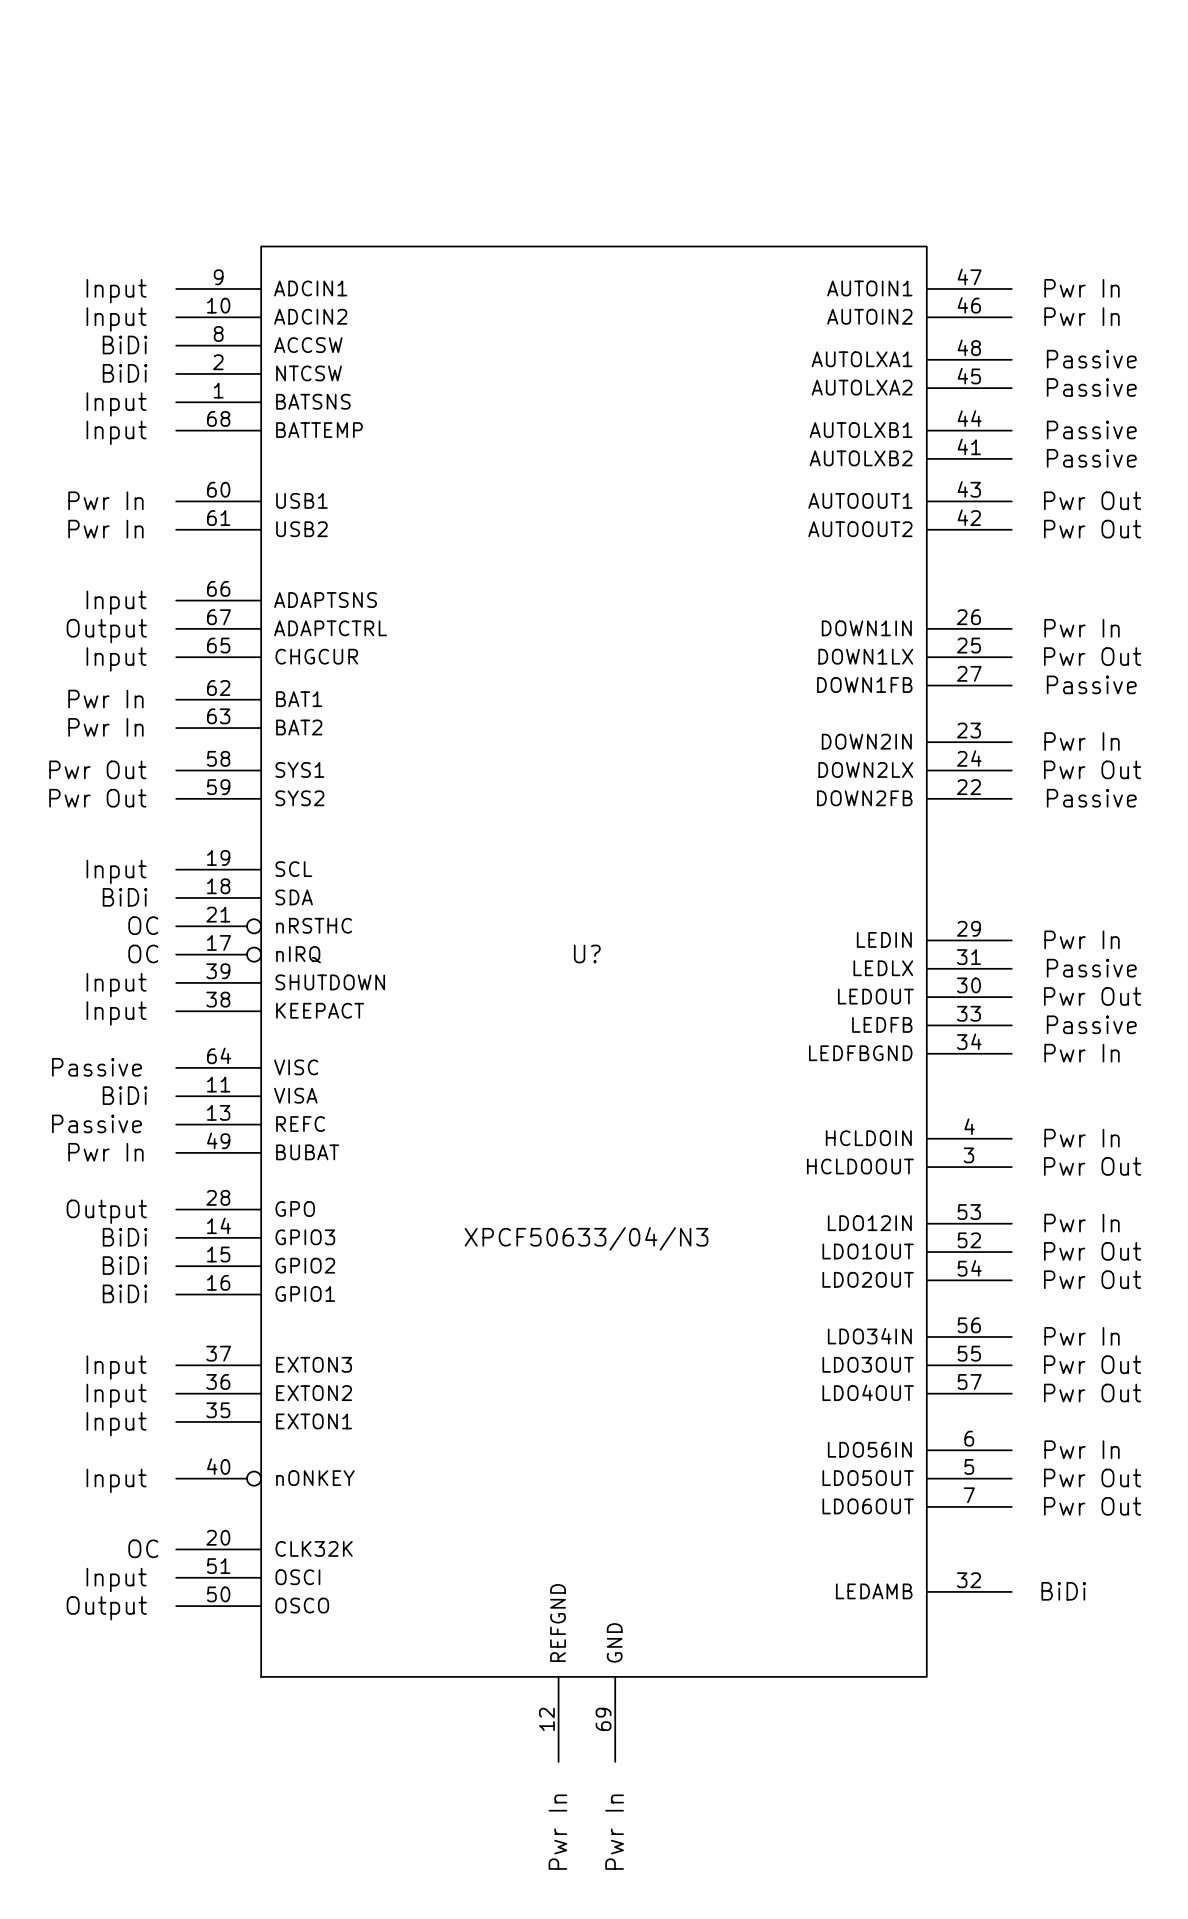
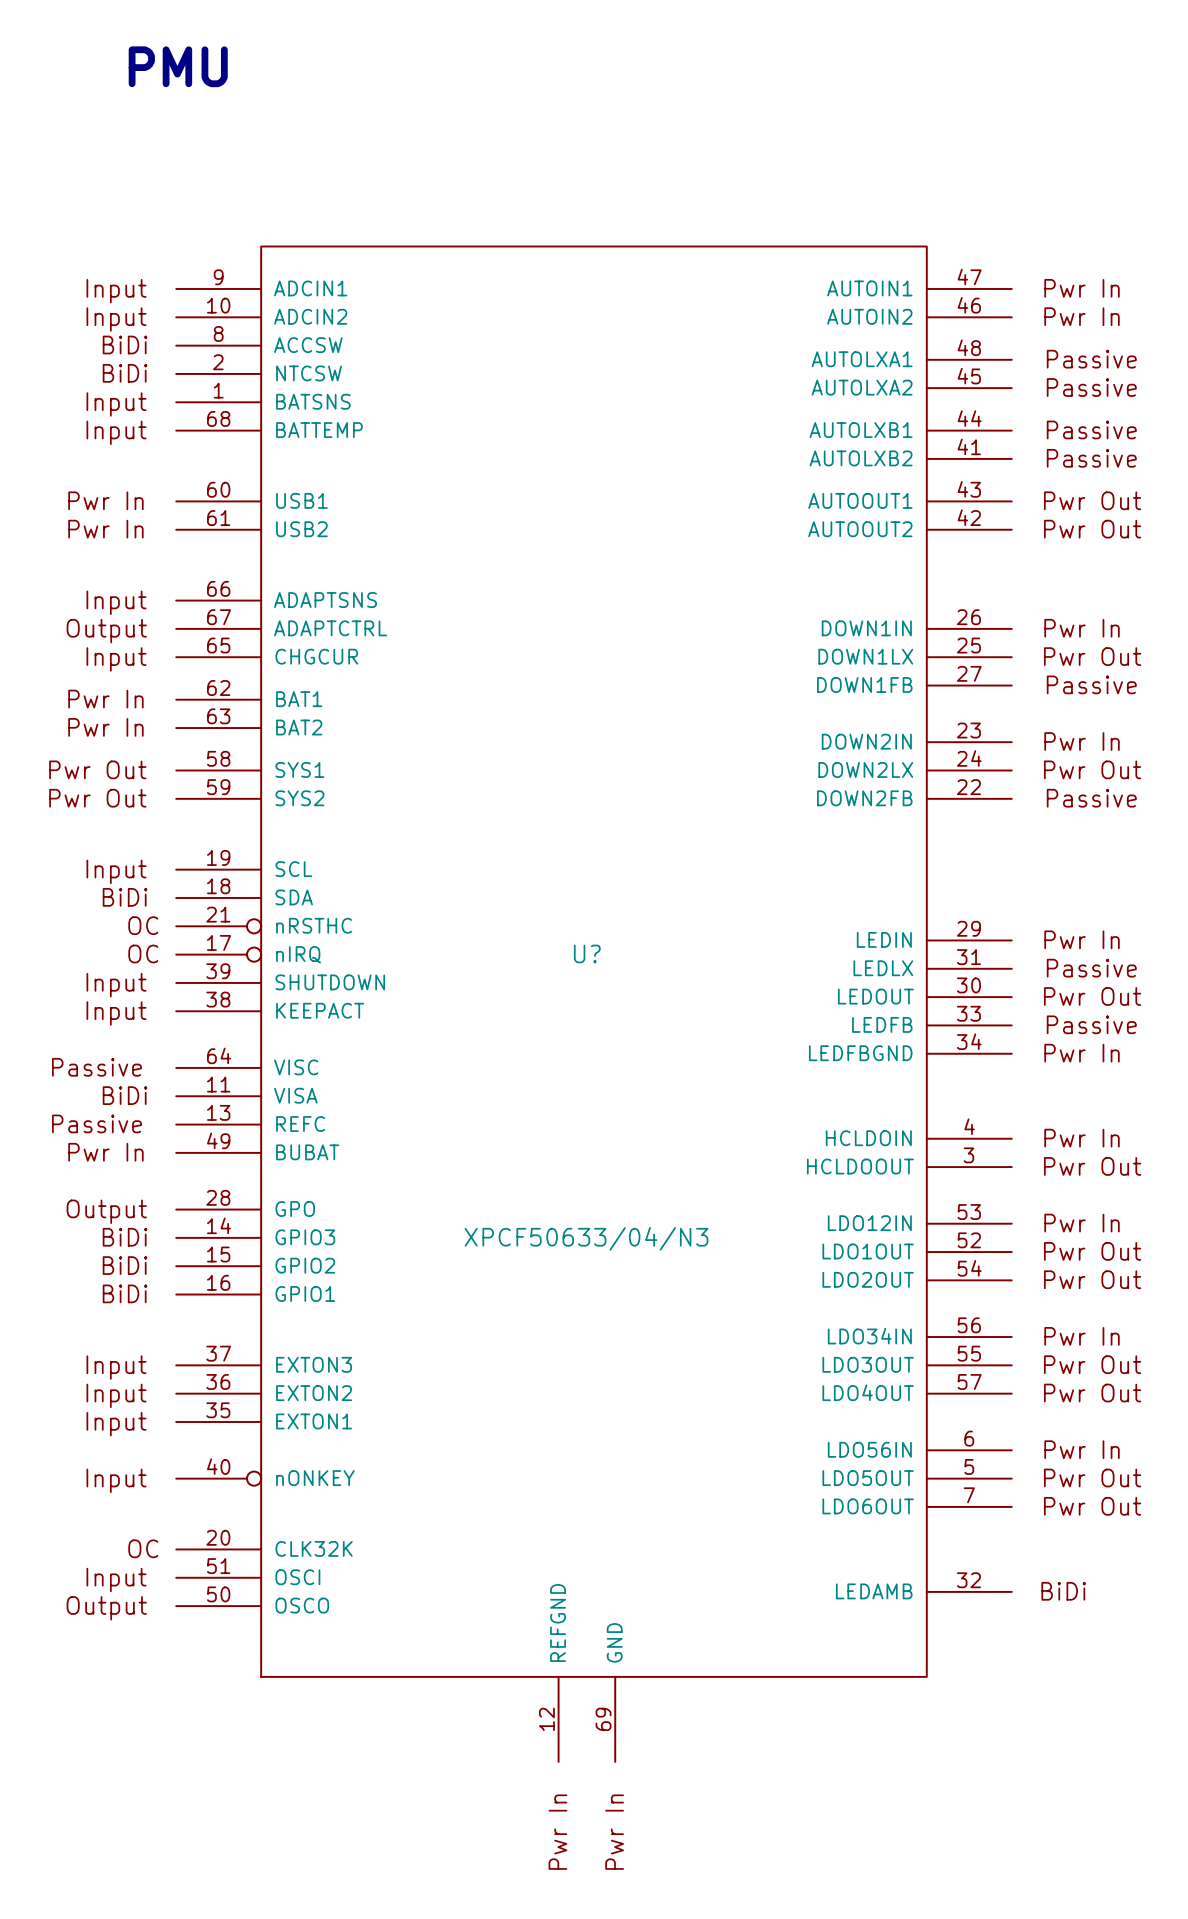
text: none -> PMU (178, 66)

